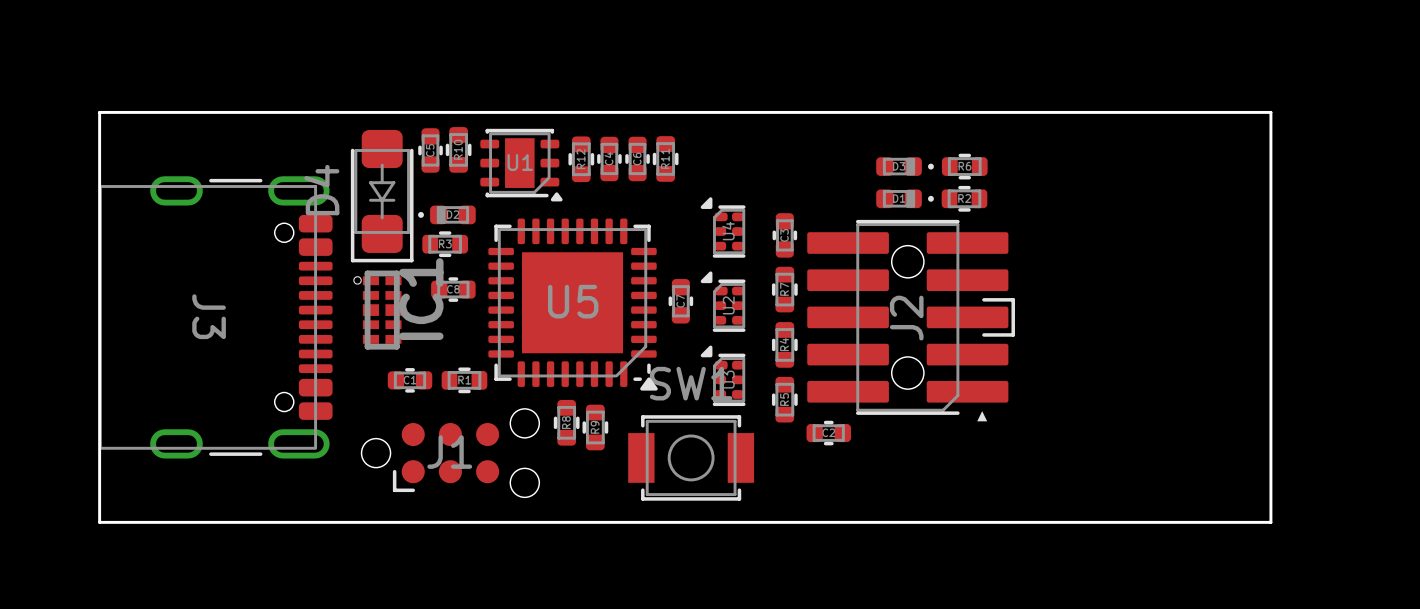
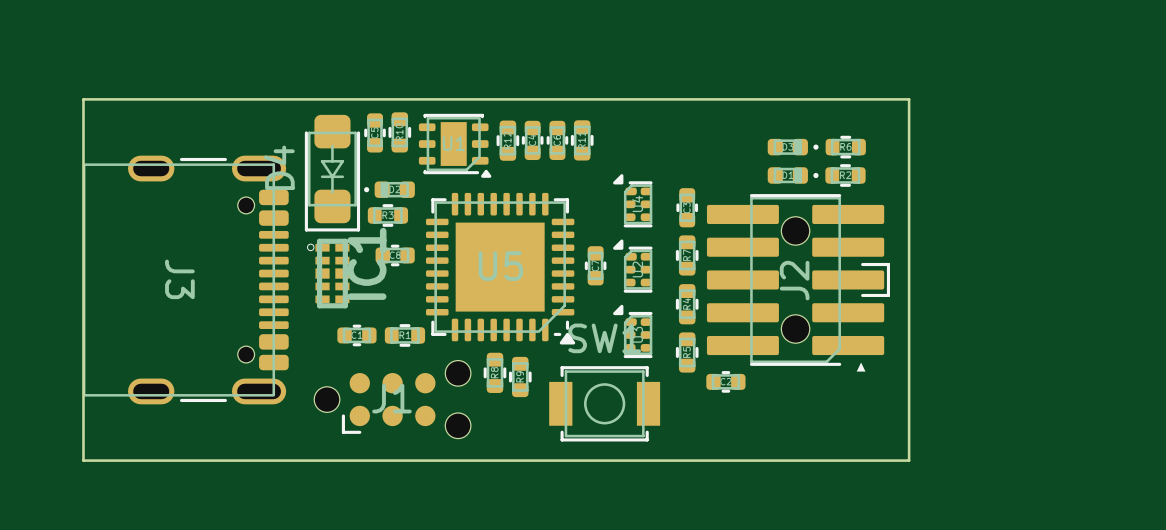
board edge: (1036, 112) (1270, 112) (1270, 522) (1036, 522) -> (909, 99) (909, 460)

